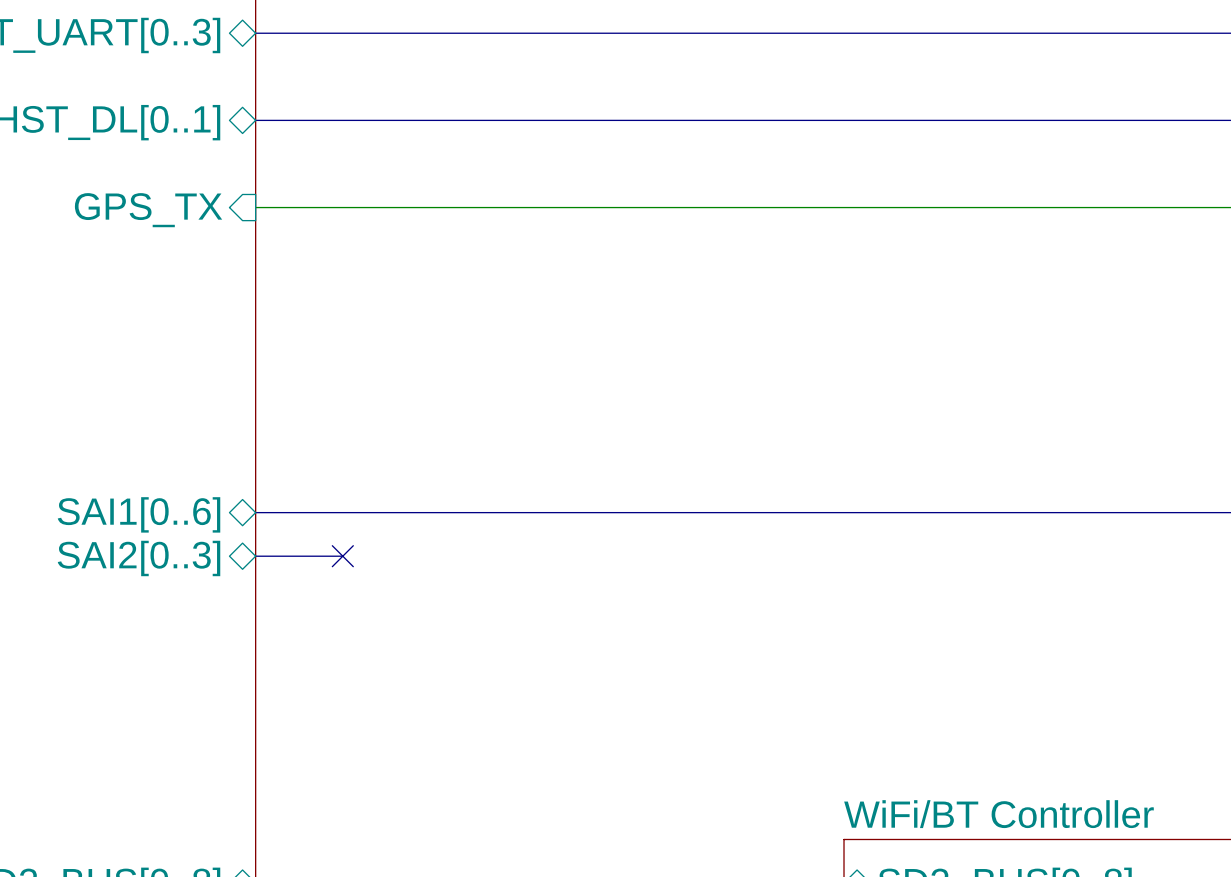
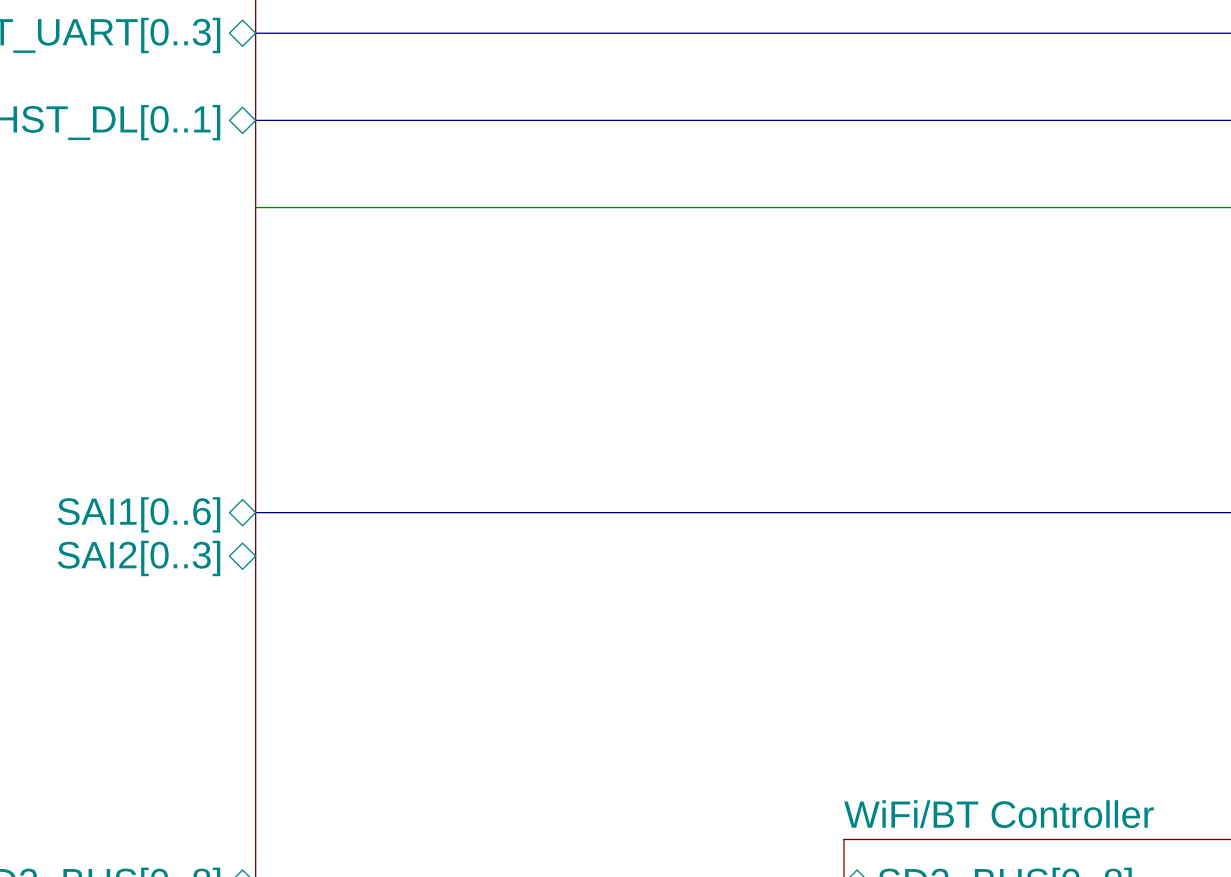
sheet pin: GPS_TX (148, 210) -> none
bus: (255, 556) (342, 556) -> none
no-connect mark: (342, 556) -> none

